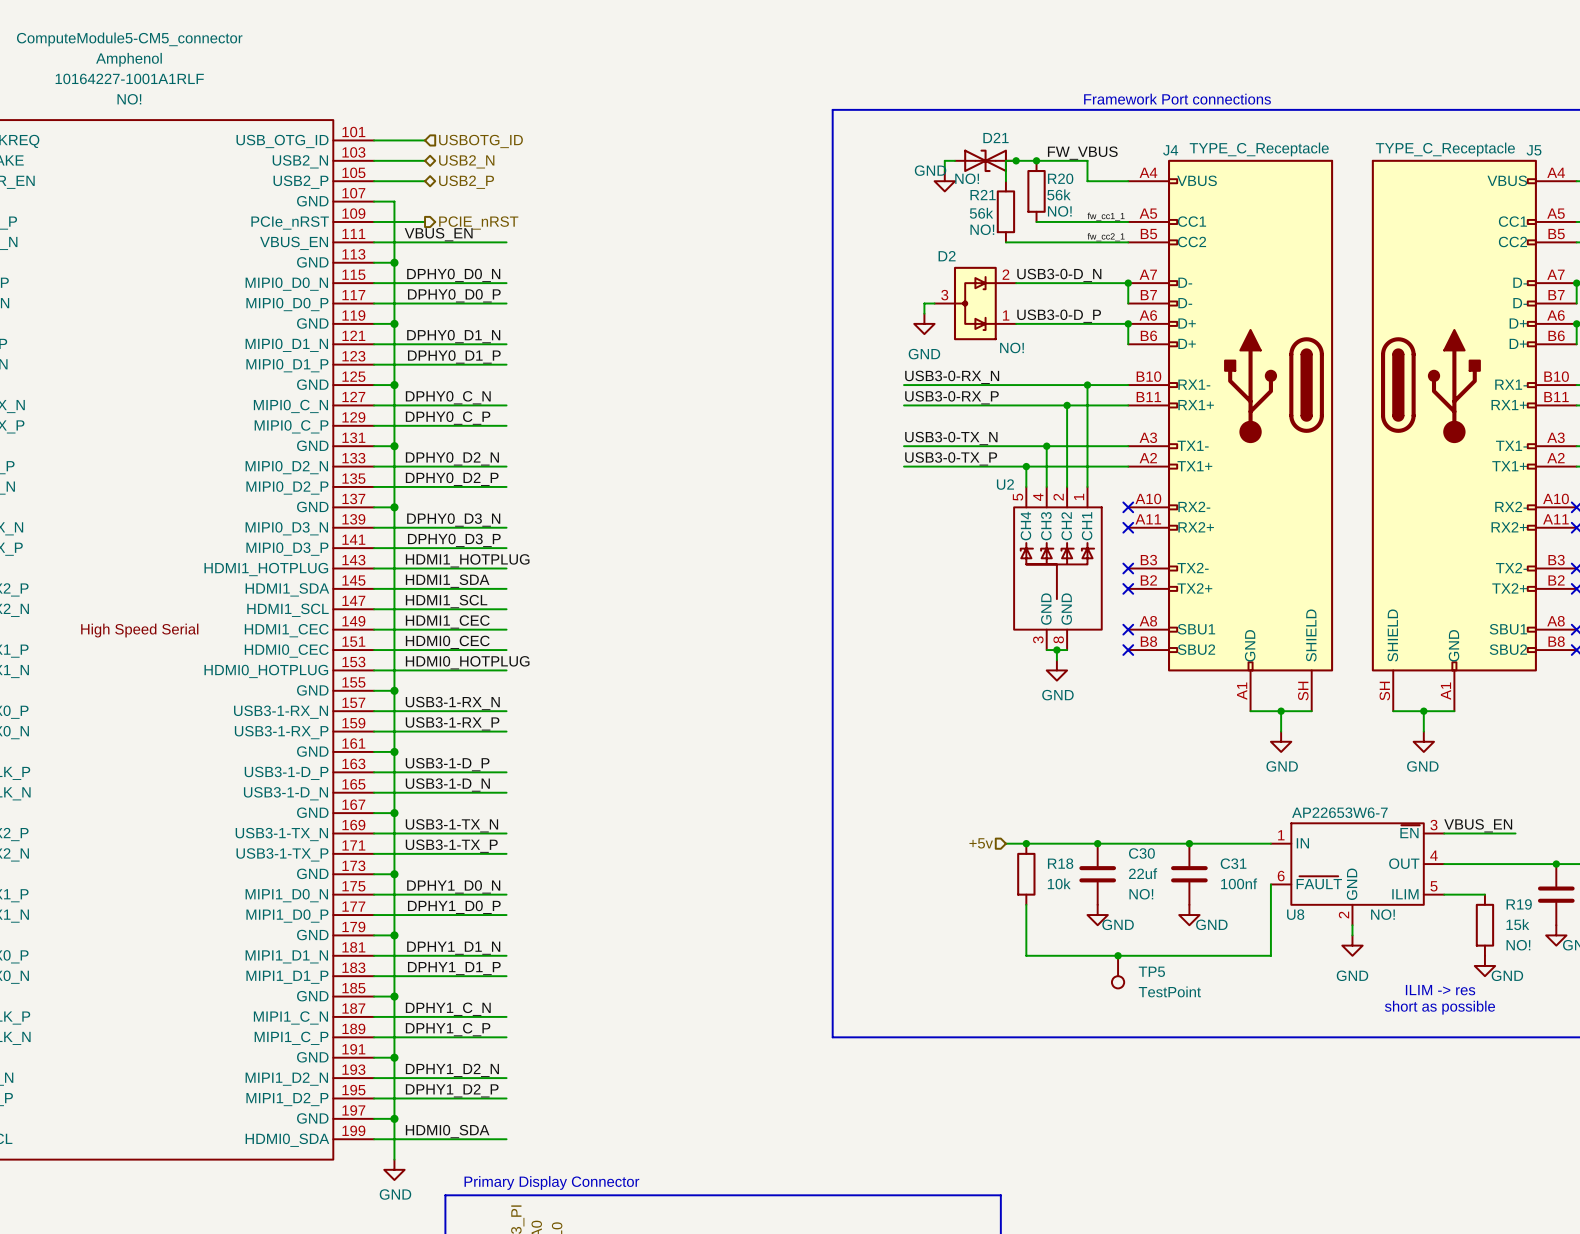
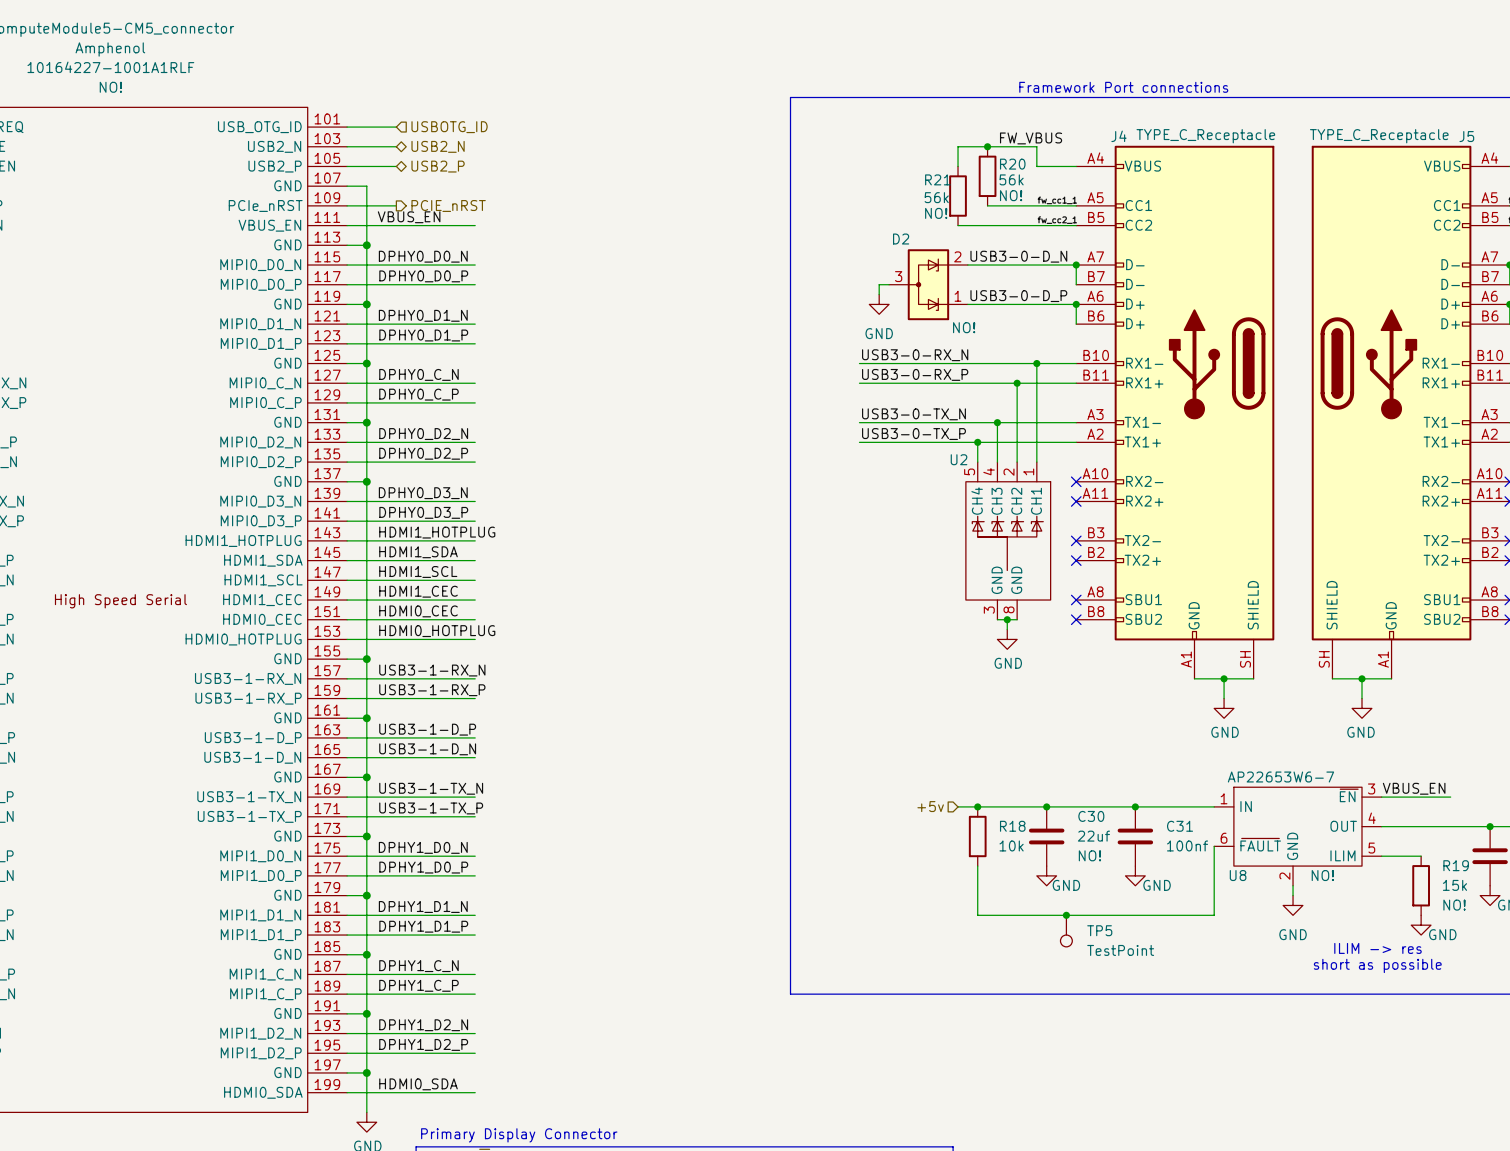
wire: (954, 160) (944, 160) (944, 171) -> none
D21: (985, 160) -> none
junction: (1016, 160) -> none
power symbol: GND (944, 181) -> none

